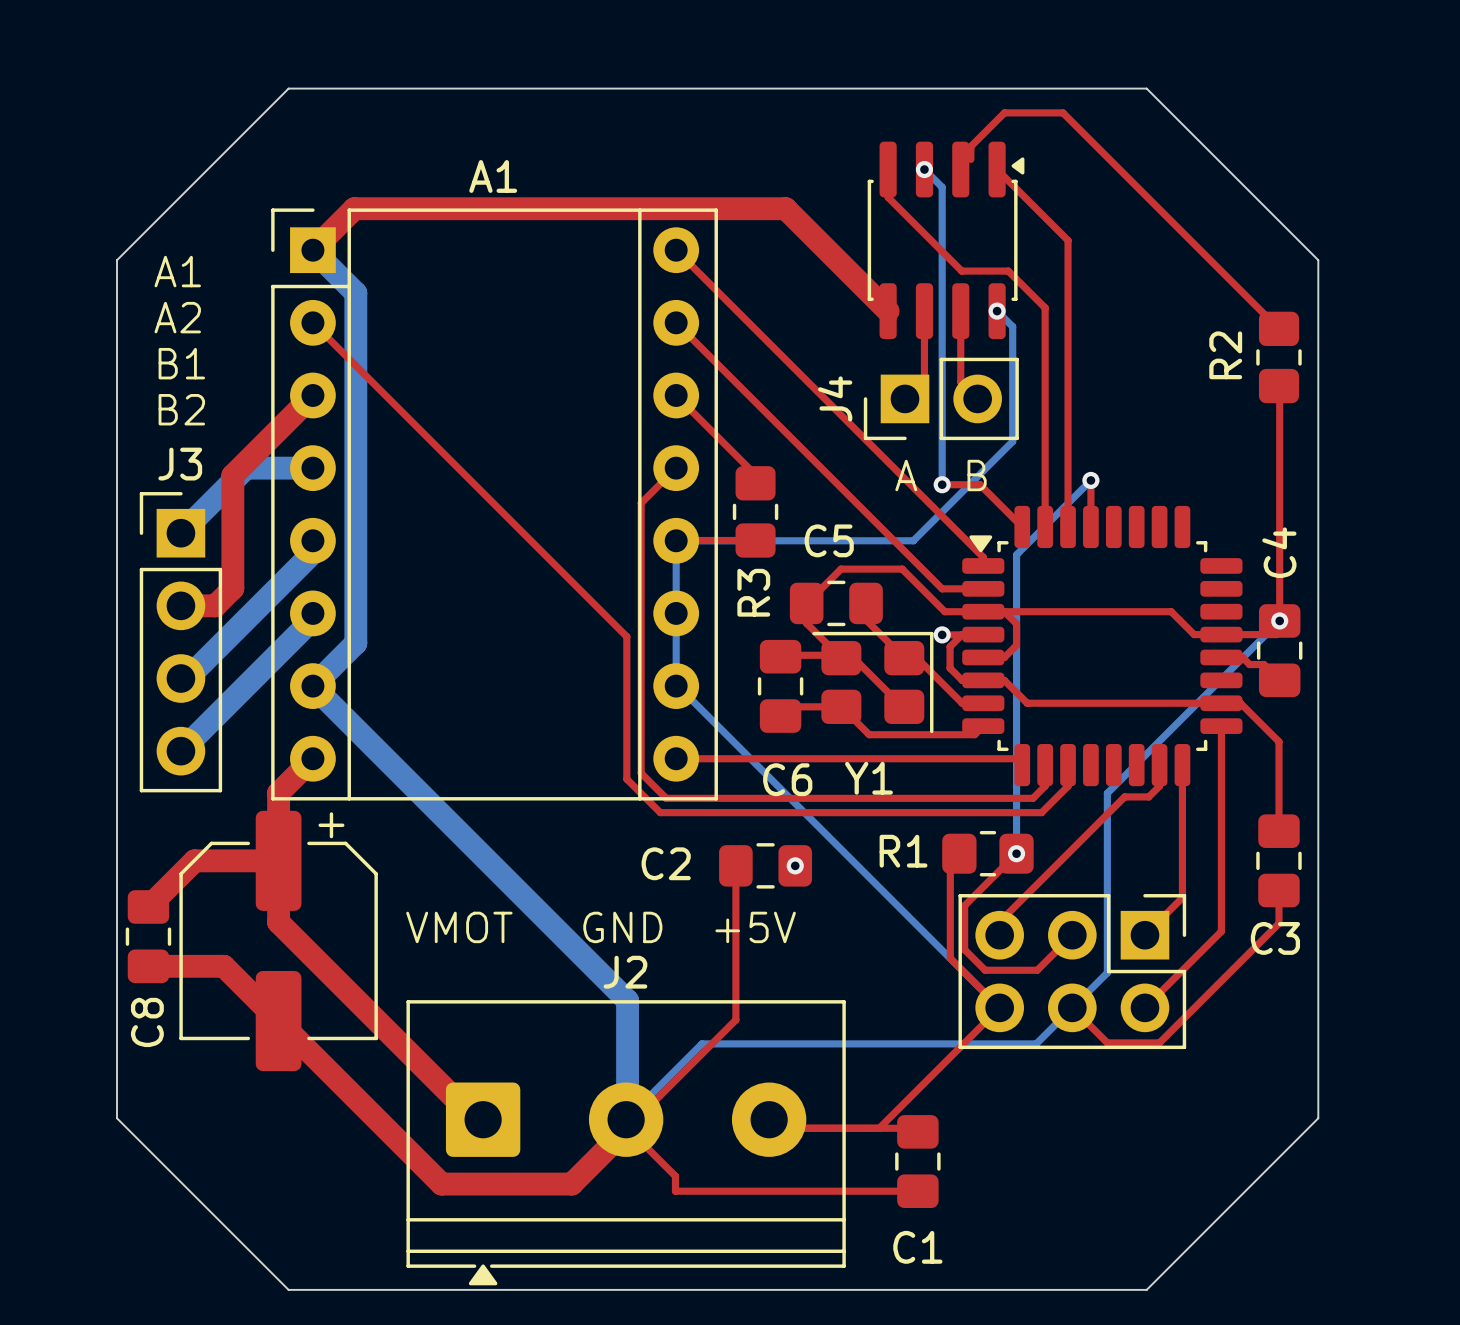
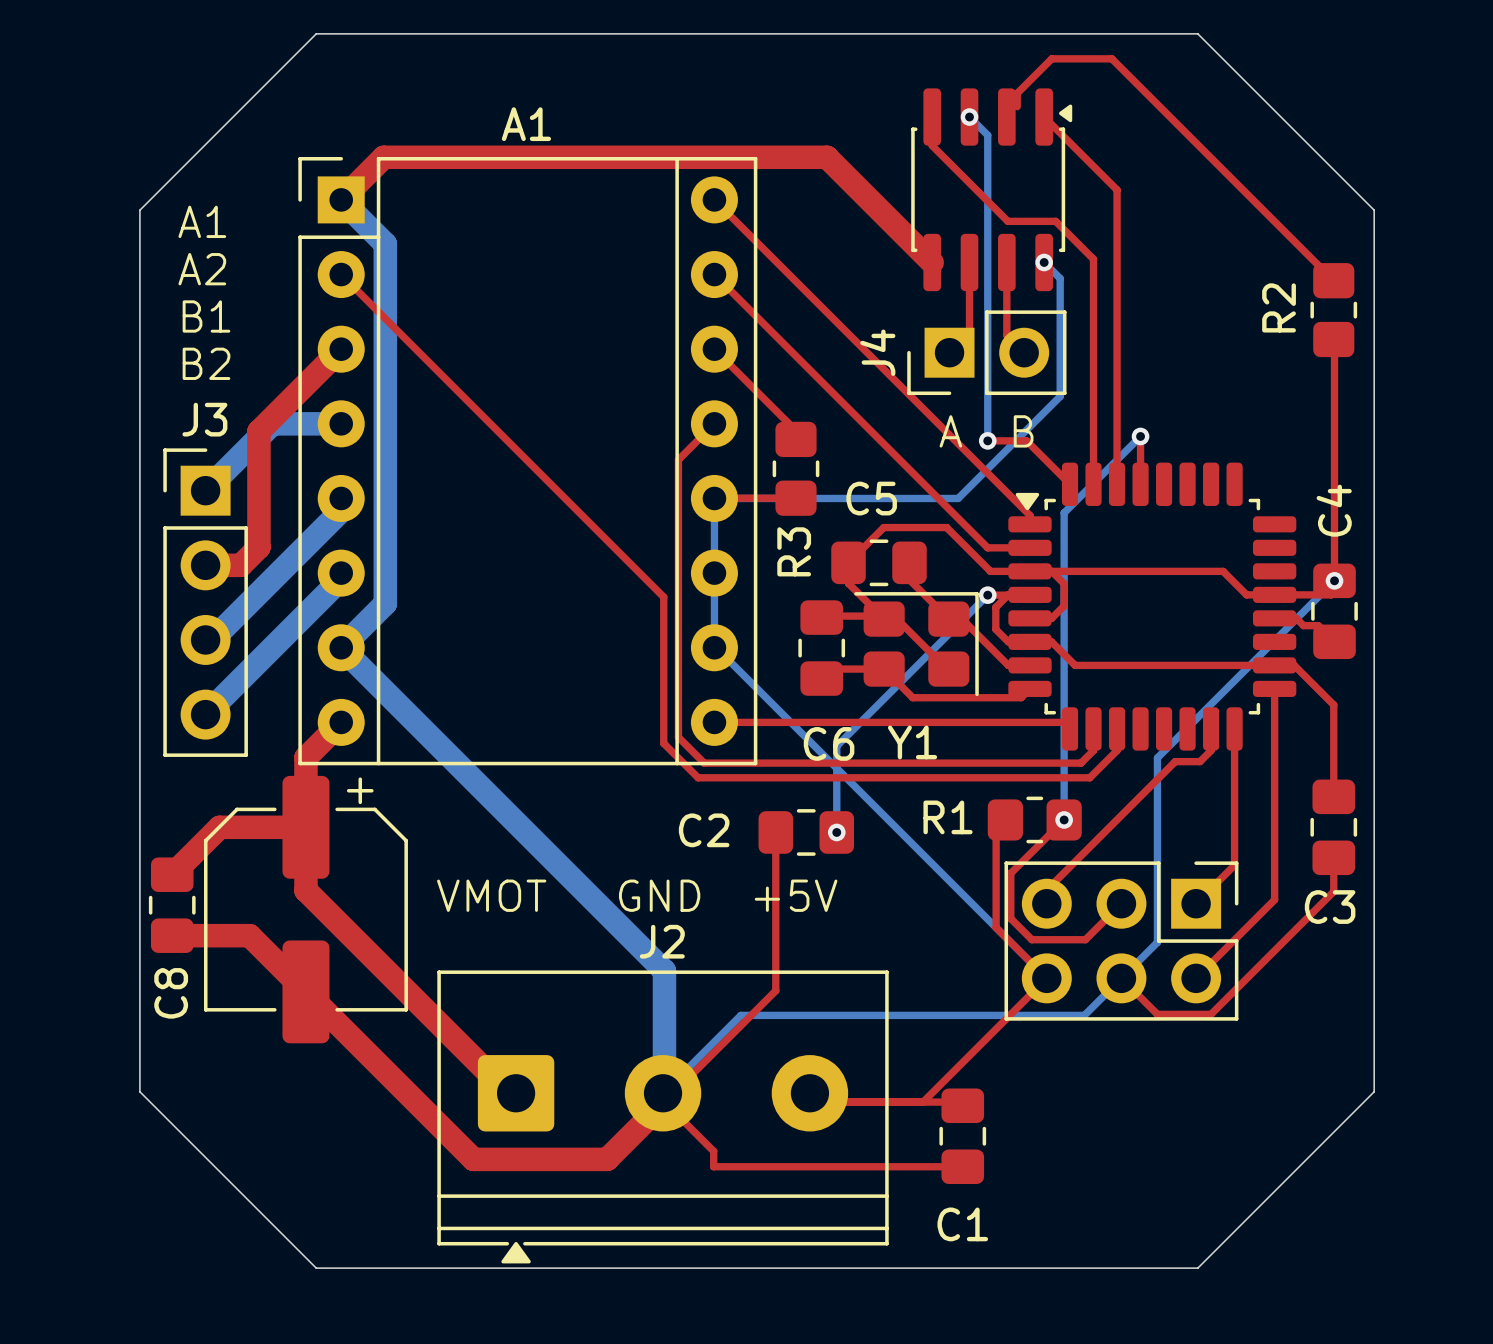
bottom track: none -> (987, 595) (836, 746) (836, 832)

